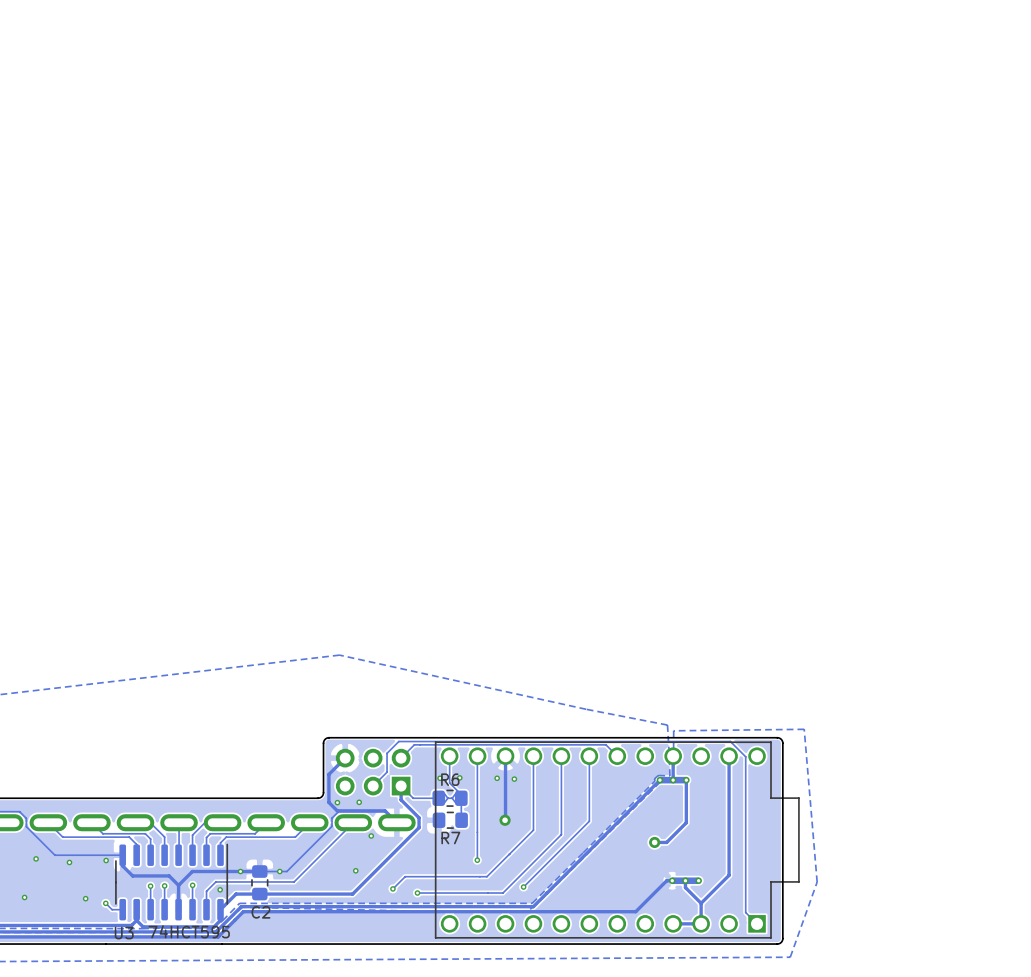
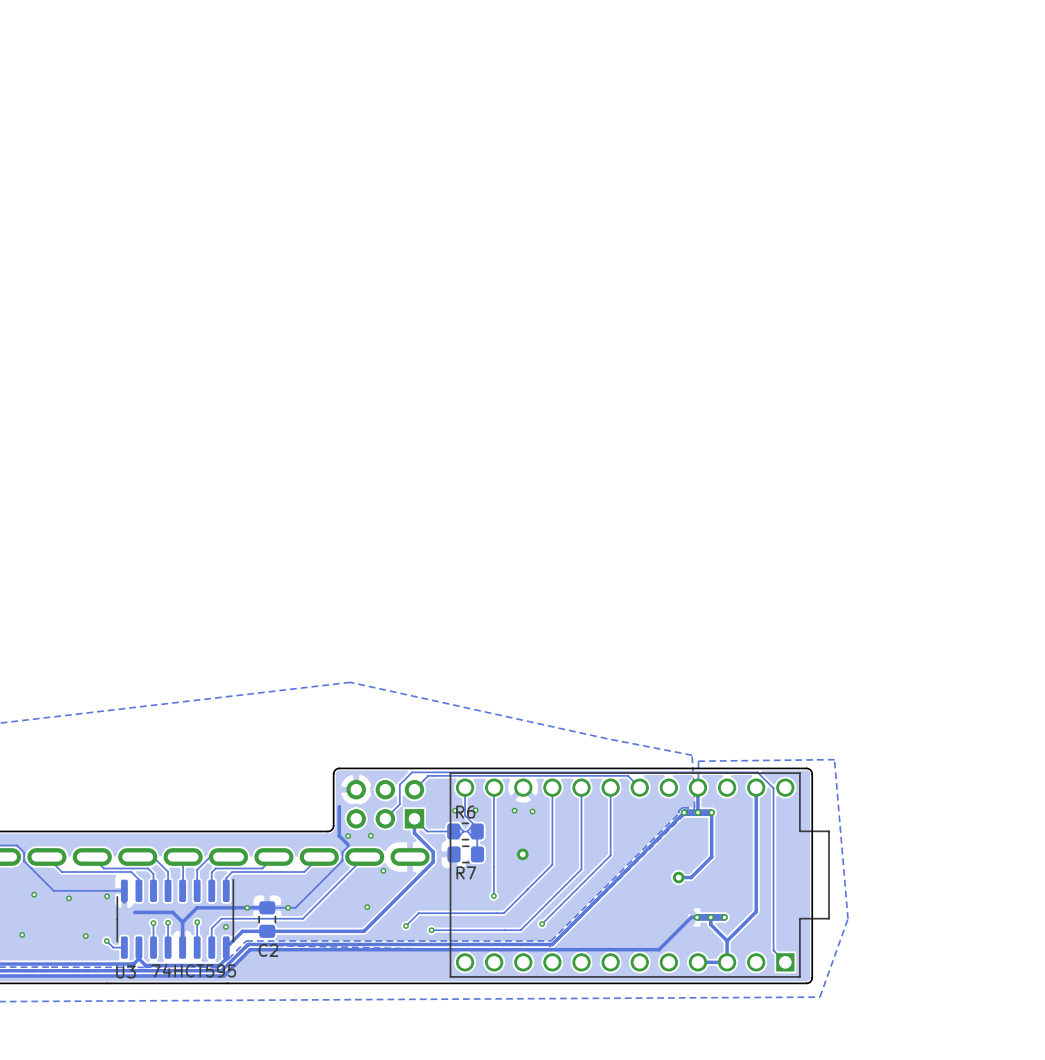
track: (505, 756) (505, 819) -> none
track: (345, 758) (328, 774) -> none
track: (337, 810) (385, 810) (396, 822) (385, 811) (338, 811) -> none
track: (122, 865) (132, 875) -> none

